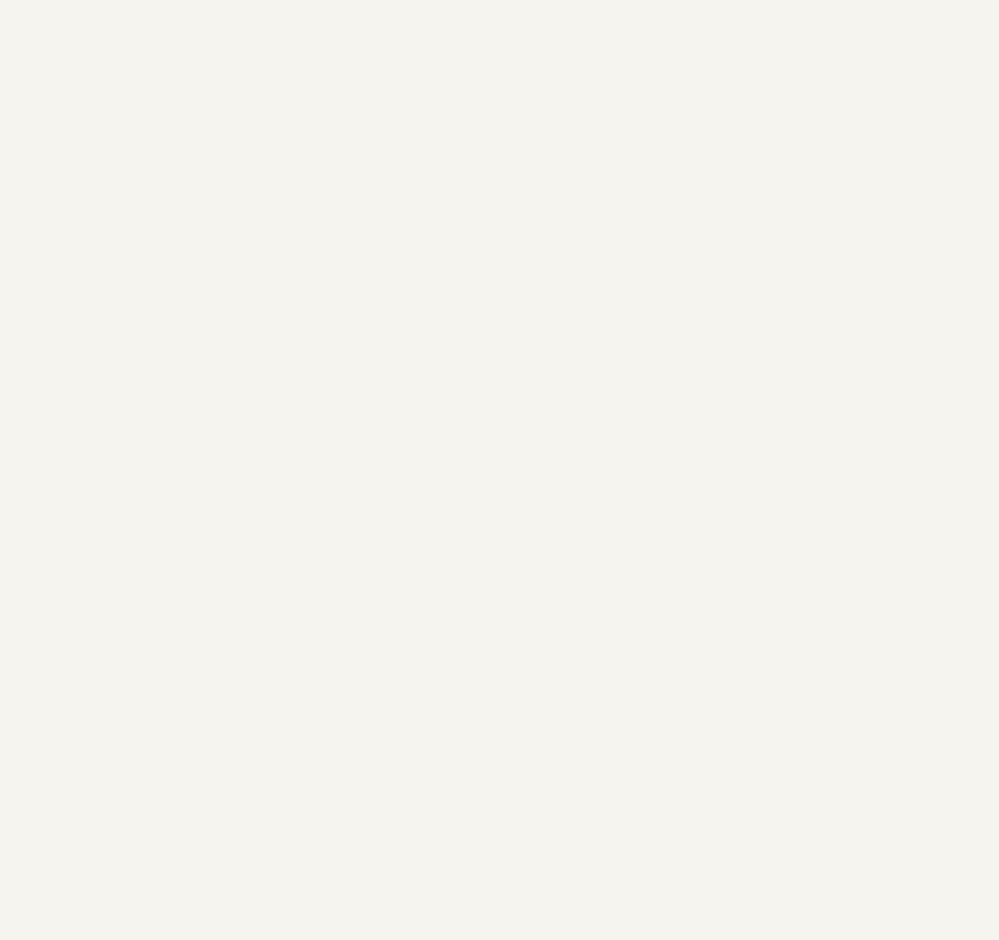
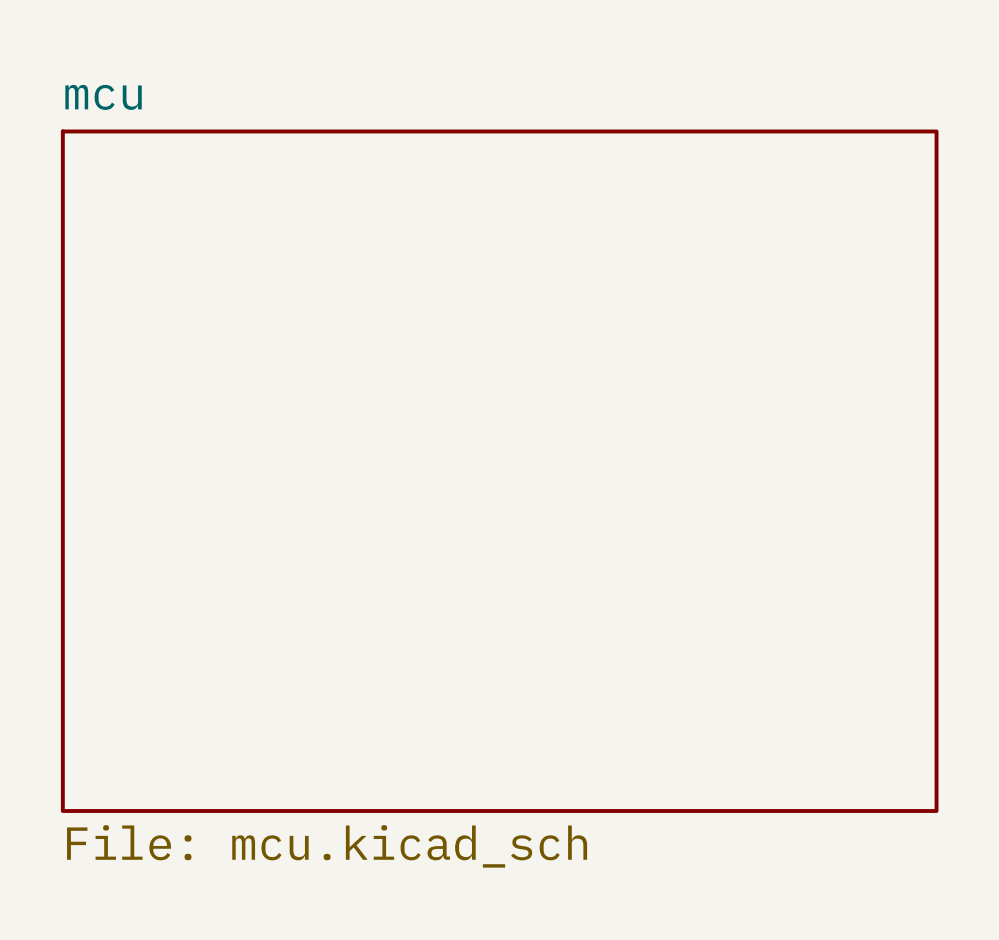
sheet mcu: none -> File: mcu.kicad_sch (499, 471)

